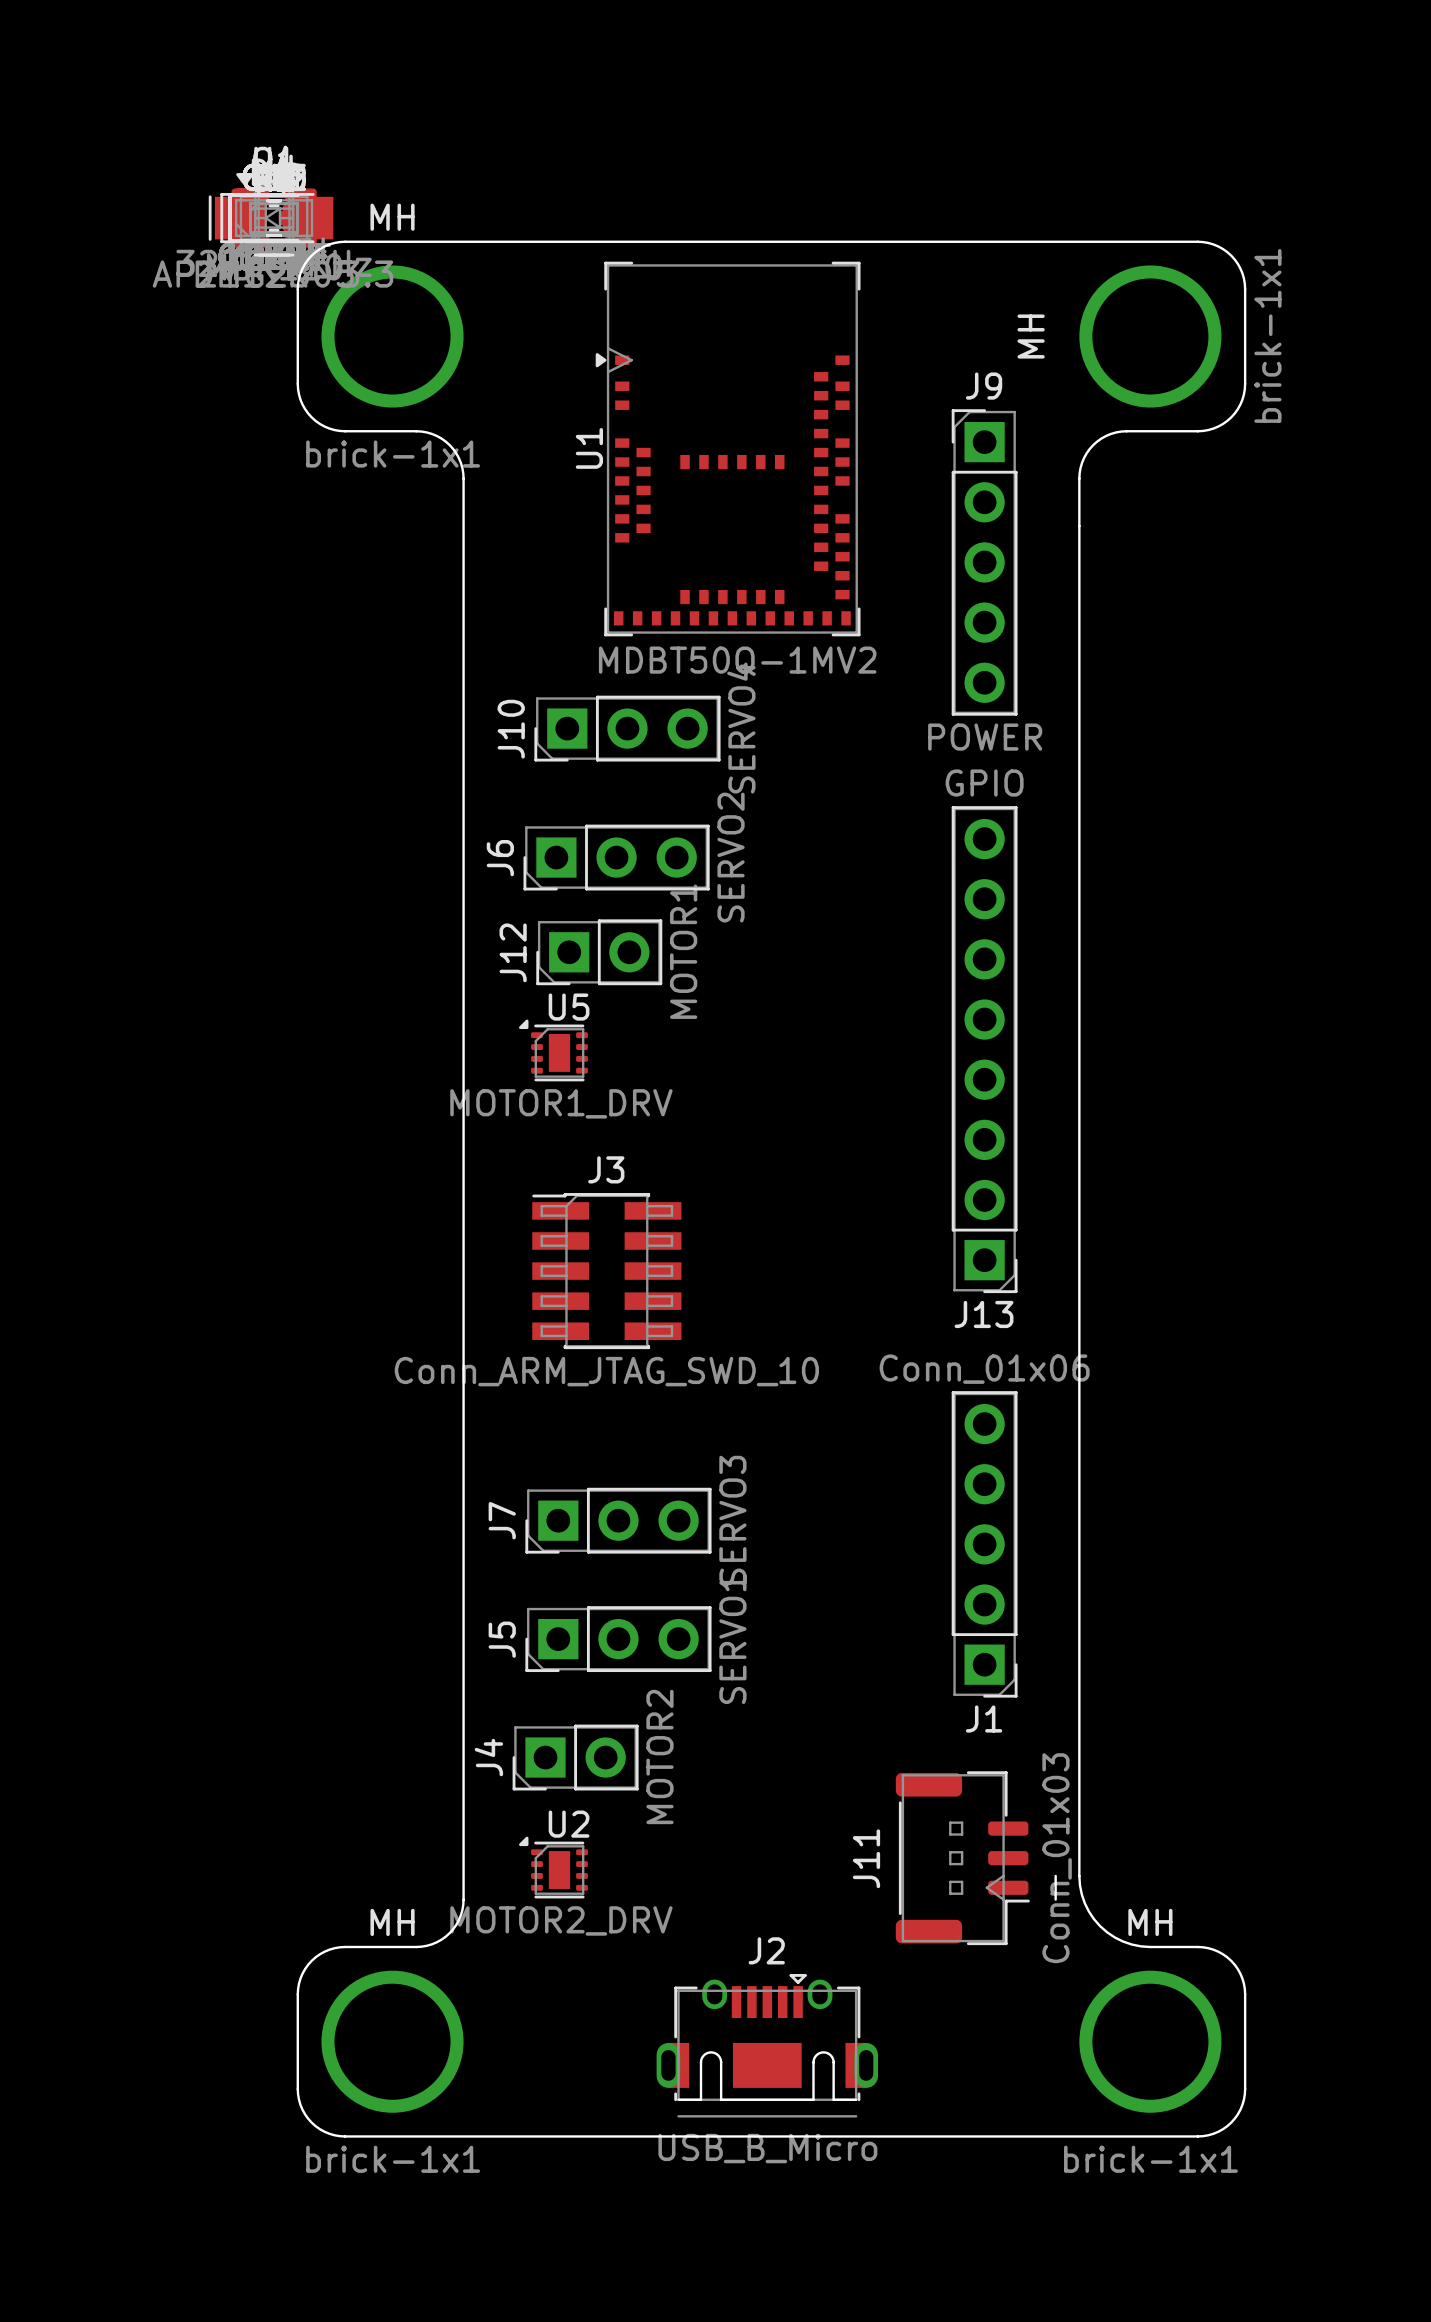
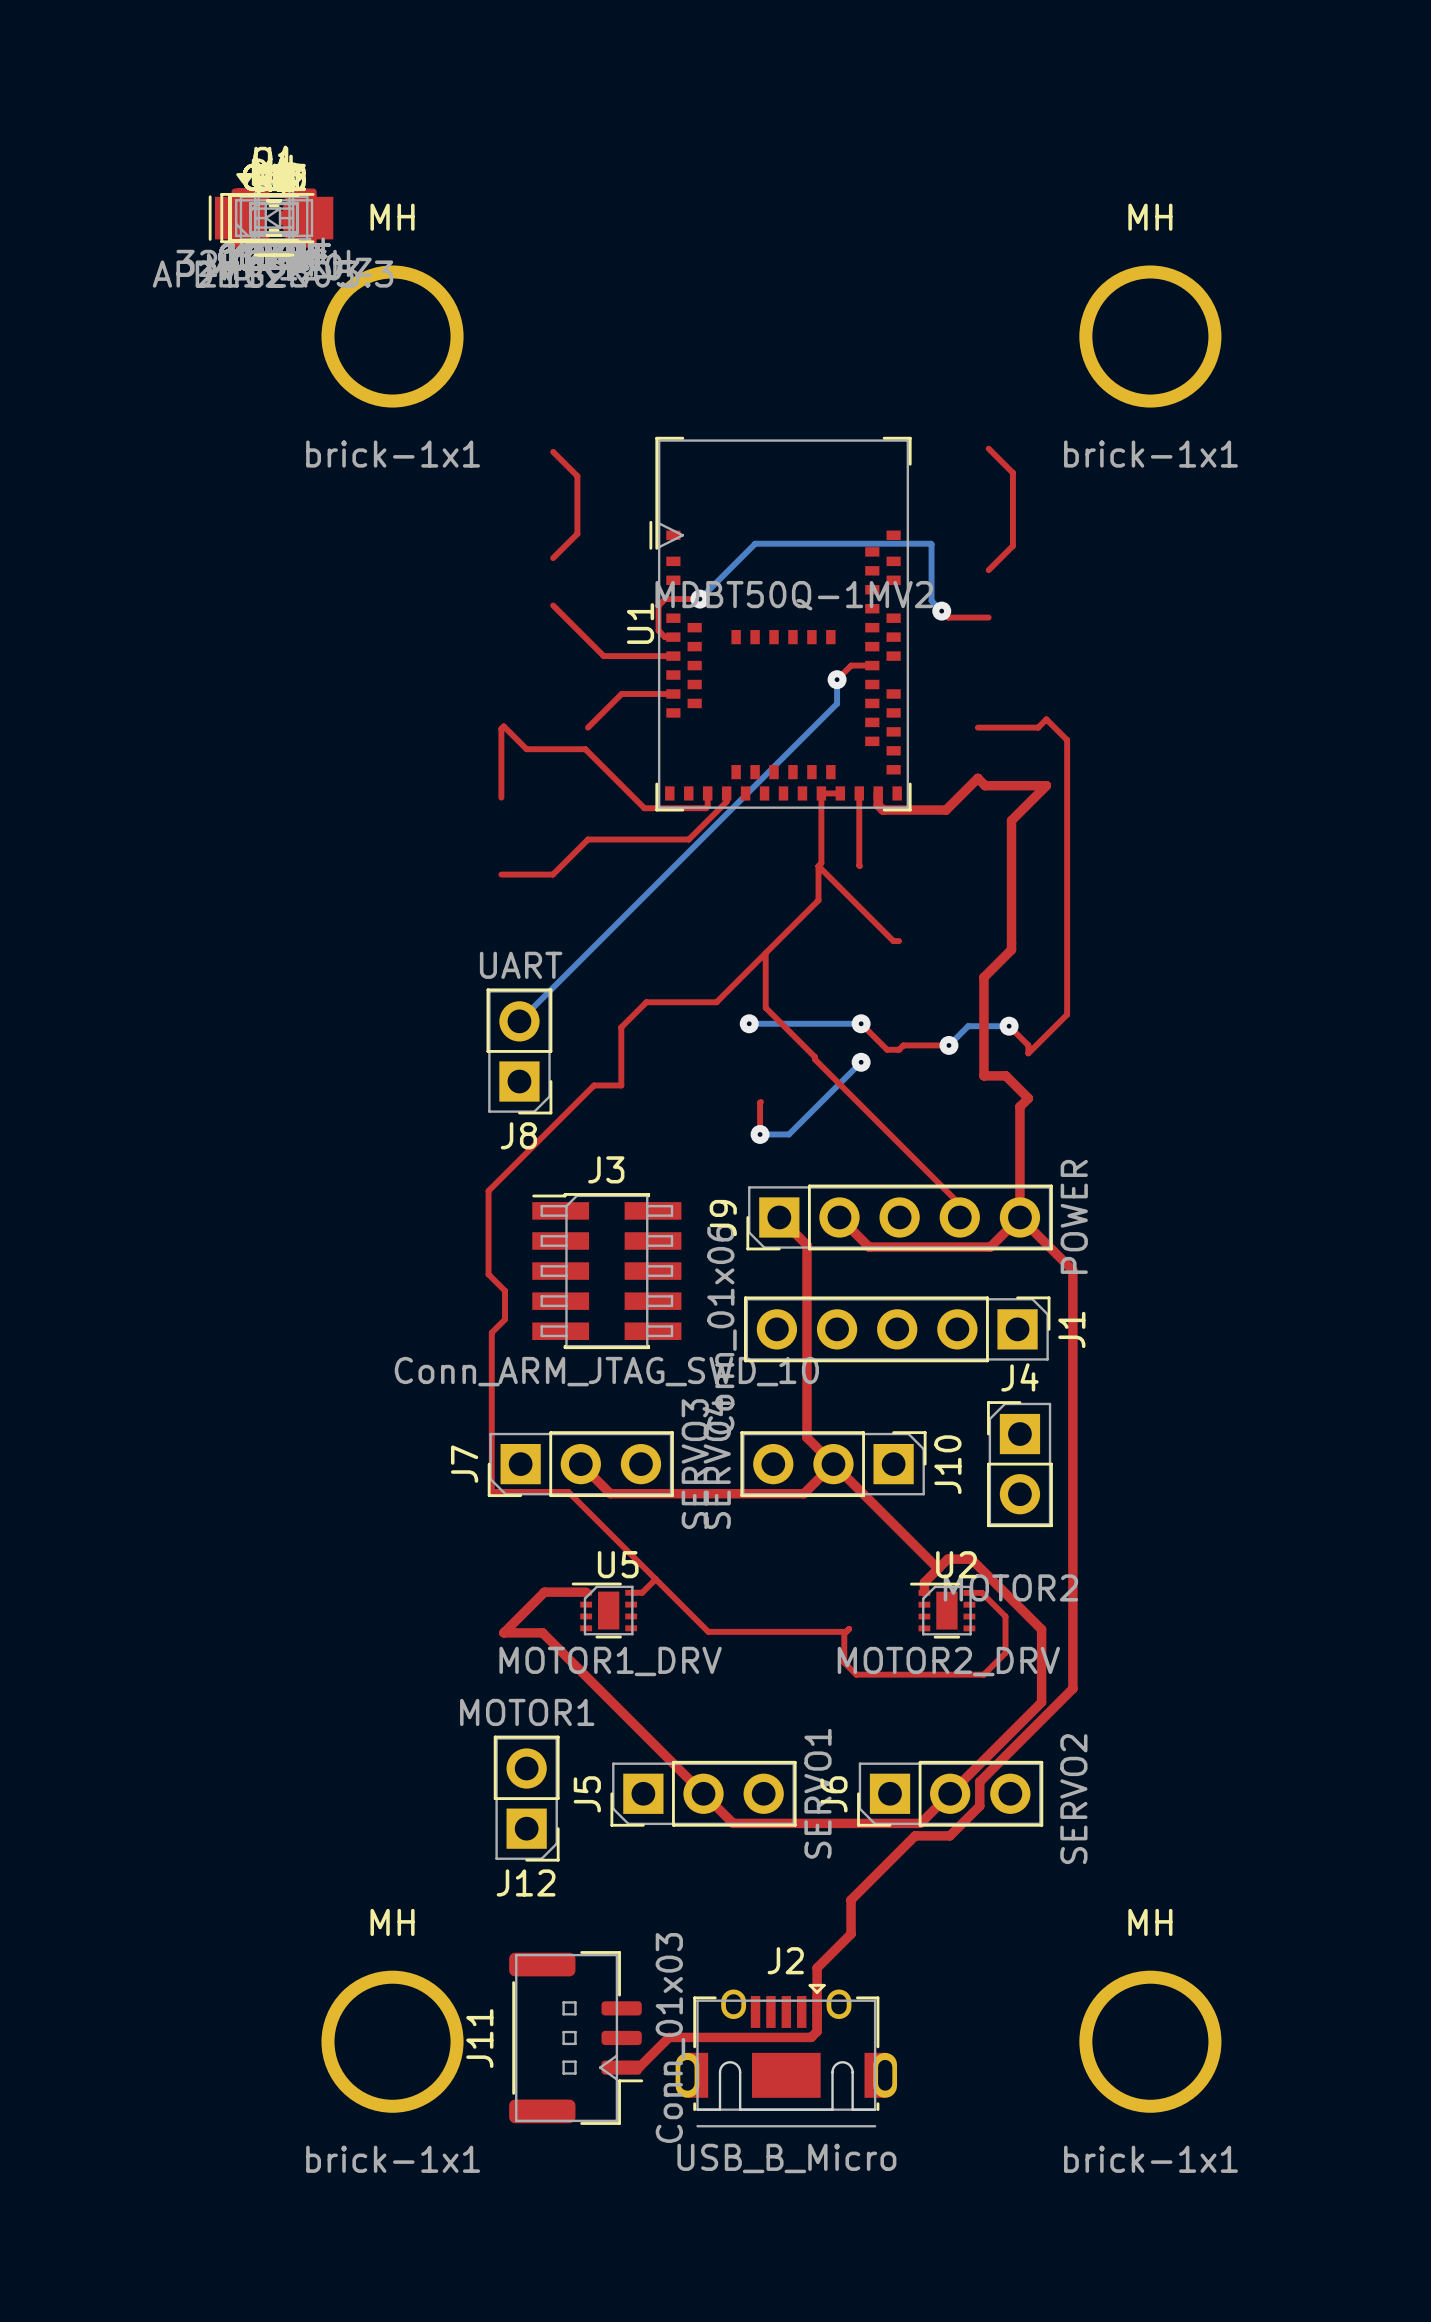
board edge: (345, 241) (1197, 241) (1208, 242) (1222, 249) (1234, 259) (1240, 268) (1245, 289) (1245, 383) (1242, 399) (1234, 413) (1222, 423) (1208, 430) (1121, 431) (1106, 435) (1097, 441) (1086, 453) (1080, 468) (1079, 478) (1079, 1885) (1088, 1911) (1100, 1926) (1114, 1937) (1141, 1946) (1208, 1948) (1227, 1957) (1237, 1969) (1243, 1983) (1245, 1994) (1244, 2094) (1240, 2109) (1234, 2118) (1218, 2131) (1197, 2136) (345, 2136) (329, 2133) (319, 2129) (308, 2118) (302, 2109) (297, 2089) (297, 1994) (300, 1978) (308, 1964) (319, 1954) (334, 1948) (421, 1946) (436, 1942) (445, 1936) (456, 1924) (460, 1915) (463, 1899) (463, 473) (458, 458) (453, 449) (436, 435) (421, 431) (334, 430) (315, 420) (302, 404) (297, 383) (298, 278) (305, 263) (315, 252) (329, 244) (345, 241) -> none
U1 footprint: [595, 261, 861, 637] -> [649, 436, 912, 812]
MH value rotation: 0° (1267, 335) -> 90° clockwise (1150, 454)
MH name rotation: 0° (1031, 336) -> 90° clockwise (1150, 217)
MH name position: MH (1031, 336) -> MH (1150, 217)
top track: none -> (988, 448) (1012, 472) (1012, 545) (988, 570)
top track: none -> (553, 451) (577, 476) (577, 533) (553, 558)
J9 rotation: 0° (984, 562) -> 90° counterclockwise (899, 1217)
J9 position: (984, 562) -> (899, 1217)
top track: none -> (699, 599) (665, 599) (658, 605) (658, 630) (665, 637) (673, 637)
bottom track: none -> (699, 599) (755, 543) (930, 543) (931, 600) (941, 611)
via: none -> (699, 599)
top track: none -> (553, 605) (603, 656) (673, 656)
top track: none -> (941, 611) (948, 617) (988, 617)
via: none -> (941, 611)
U1 value position: MDBT50Q-1MV2 (737, 661) -> MDBT50Q-1MV2 (794, 595)
top track: none -> (872, 665) (851, 665) (837, 679)
bottom track: none -> (837, 679) (837, 703) (519, 1021)
via: none -> (837, 679)
top track: none -> (673, 693) (621, 693) (588, 727)
top track: none -> (977, 727) (1038, 727) (1046, 719) (1067, 740) (1067, 1014) (1028, 1053) (1028, 1045) (1009, 1026)
J10 rotation: 0° (627, 728) -> 180° (833, 1464)
J10 position: (627, 728) -> (833, 1464)
top track: none -> (707, 793) (707, 806) (705, 808) (644, 808) (585, 749) (526, 749) (503, 726) (501, 728) (501, 797)
top track: none -> (726, 793) (726, 801) (688, 839) (588, 839) (552, 874) (501, 874)
top track: none -> (840, 793) (821, 793) (821, 863) (818, 866)
top track: none -> (859, 793) (859, 866)
top track: none -> (878, 793) (878, 805) (882, 810) (946, 810) (977, 778) (985, 785) (1046, 785) (1011, 820) (1011, 949) (983, 977) (983, 1075) (1005, 1075) (1028, 1098) (1019, 1106) (1019, 1217)
J6 position: (616, 857) -> (950, 1793)
J6 value position: SERVO2 (731, 857) -> SERVO2 (1073, 1799)
top track: none -> (818, 866) (893, 941) (899, 941)
top track: none -> (818, 866) (818, 900) (716, 1002) (646, 1002) (621, 1027) (621, 1085) (594, 1085) (488, 1190) (488, 1274) (505, 1290) (505, 1319) (491, 1332) (491, 1490) (568, 1491) (708, 1631) (846, 1631)
J12 rotation: 0° (599, 952) -> 90° counterclockwise (526, 1798)
J12 position: (599, 952) -> (526, 1798)
top track: none -> (765, 953) (765, 1007) (959, 1204) (959, 1217)
U5 footprint: [518, 1019, 588, 1082] -> [571, 1582, 638, 1639]
bottom track: none -> (749, 1023) (861, 1023)
via: none -> (749, 1023)
top track: none -> (861, 1023) (887, 1049) (899, 1049) (903, 1045) (948, 1045)
via: none -> (861, 1023)
bottom track: none -> (1009, 1026) (968, 1026) (948, 1045)
via: none -> (1009, 1026)
via: none -> (948, 1045)
J13: GPIO (984, 1049) -> none
J8: none -> UART (519, 1051)
bottom track: none -> (861, 1062) (788, 1134) (760, 1134)
via: none -> (861, 1062)
top track: none -> (760, 1101) (760, 1134)
via: none -> (760, 1134)
top track: none -> (779, 1217) (806, 1245) (806, 1437) (936, 1567) (939, 1567)
top track: none -> (839, 1217) (869, 1247) (990, 1247) (1019, 1217)
top track: none -> (1019, 1217) (1072, 1270) (1072, 1688) (979, 1781) (979, 1806) (949, 1835) (915, 1835) (851, 1899) (851, 1934) (817, 1967) (817, 2031) (811, 2037) (669, 2037) (638, 2067) (621, 2067)
top track: none -> (580, 1464) (610, 1493) (803, 1493) (833, 1464)
J7 position: (618, 1520) -> (580, 1464)
J1 rotation: 0° (984, 1544) -> 90° counterclockwise (897, 1329)
J1 position: (984, 1544) -> (897, 1329)
top track: none -> (655, 1579) (642, 1592) (631, 1592)
top track: none -> (586, 1592) (544, 1592) (503, 1632) (542, 1632) (733, 1823) (920, 1823) (1041, 1702) (1041, 1629) (971, 1559) (947, 1559) (924, 1582) (924, 1592)
top track: none -> (969, 1592) (981, 1592) (1005, 1616) (1005, 1653) (983, 1674) (856, 1674) (844, 1662) (844, 1633) (849, 1628)
J5 position: (618, 1639) -> (703, 1793)
J4 rotation: 0° (575, 1757) -> 90° clockwise (1019, 1464)
J4 position: (575, 1757) -> (1019, 1464)
U2 footprint: [518, 1836, 588, 1899] -> [909, 1582, 976, 1639]
J11 position: (962, 1858) -> (576, 2037)
board edge: (1055, 1875) (1055, 1899) -> none
J2 position: (767, 2045) -> (786, 2055)

